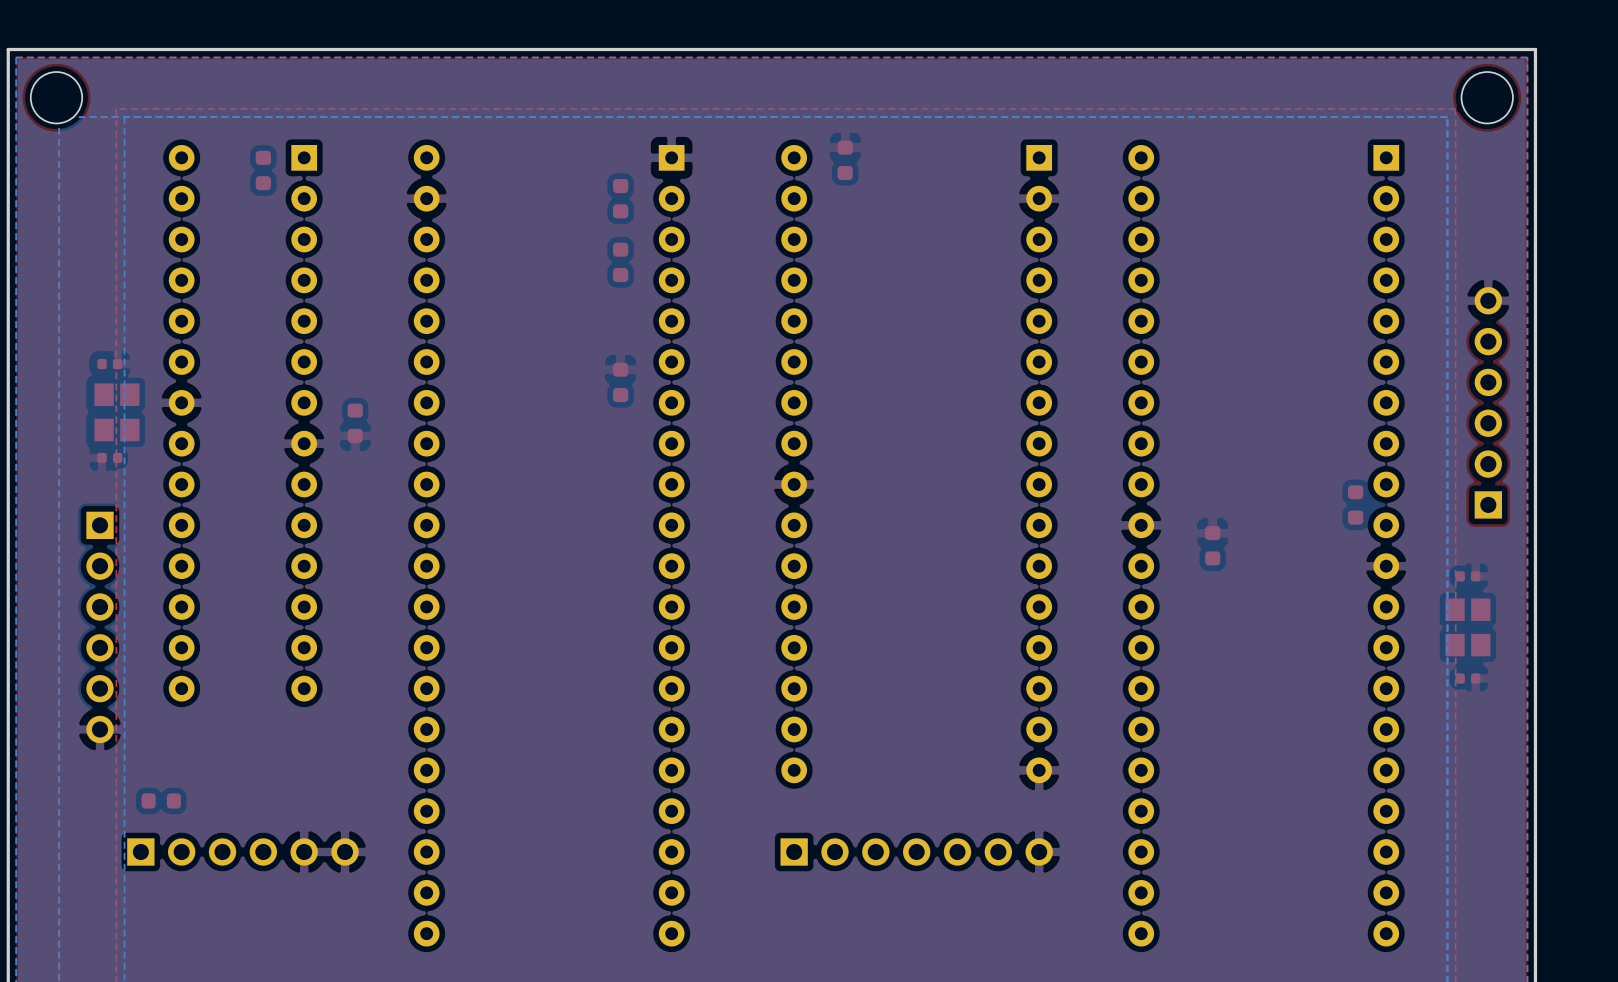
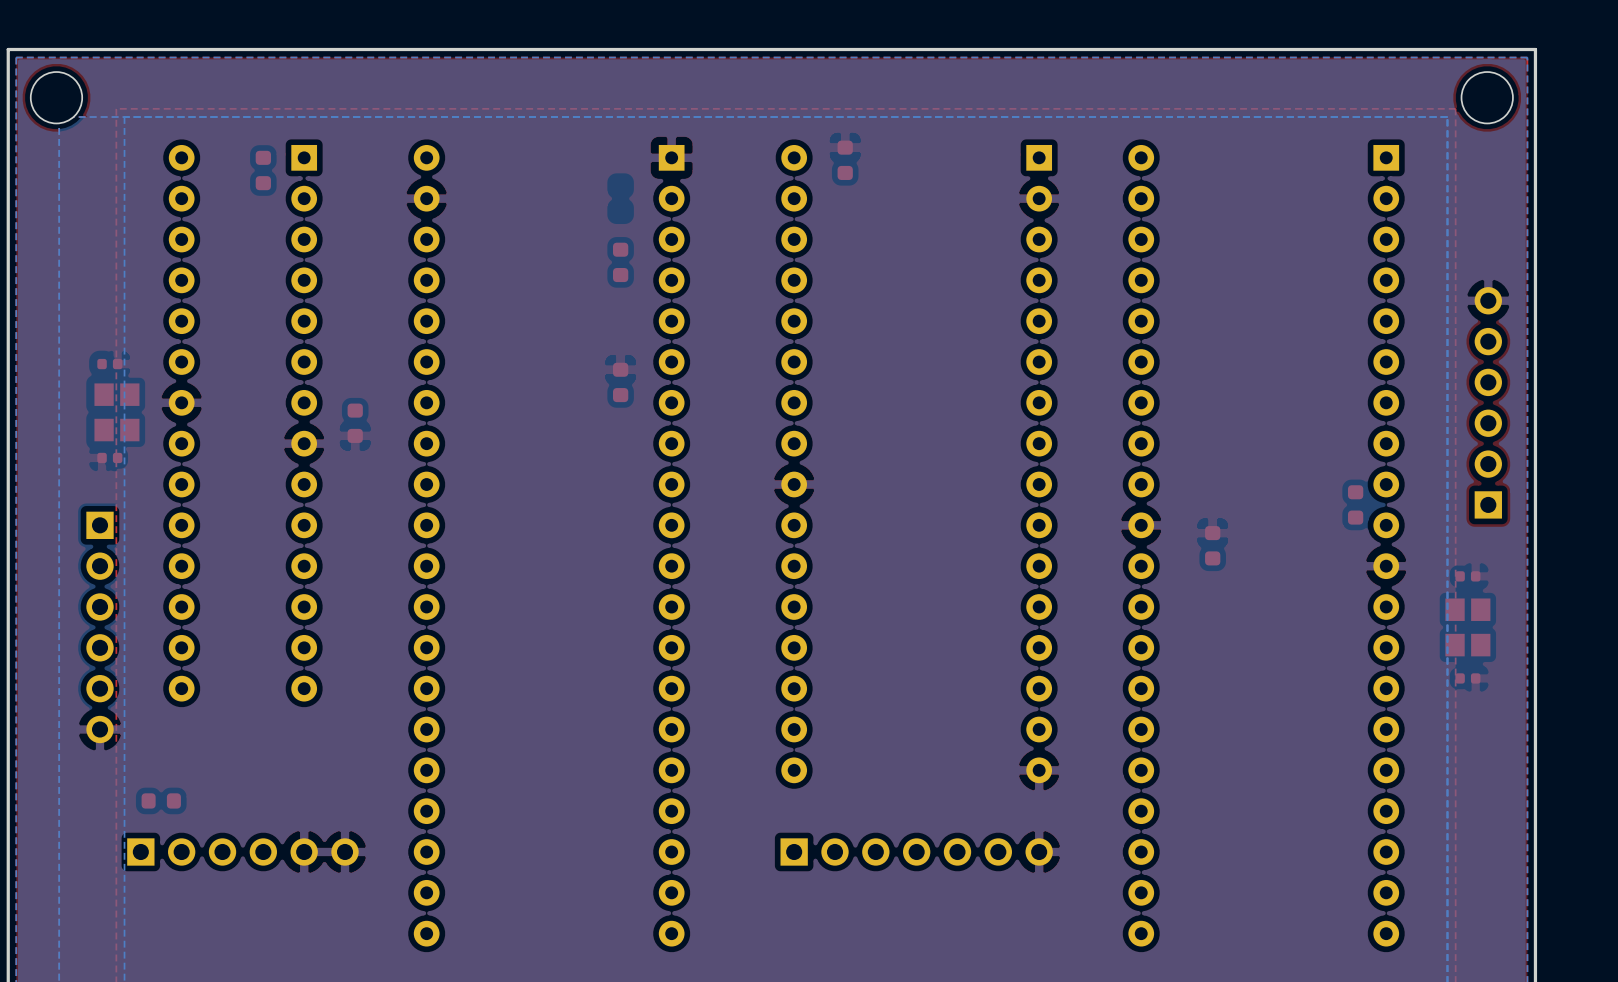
part: (620, 198) -> none

